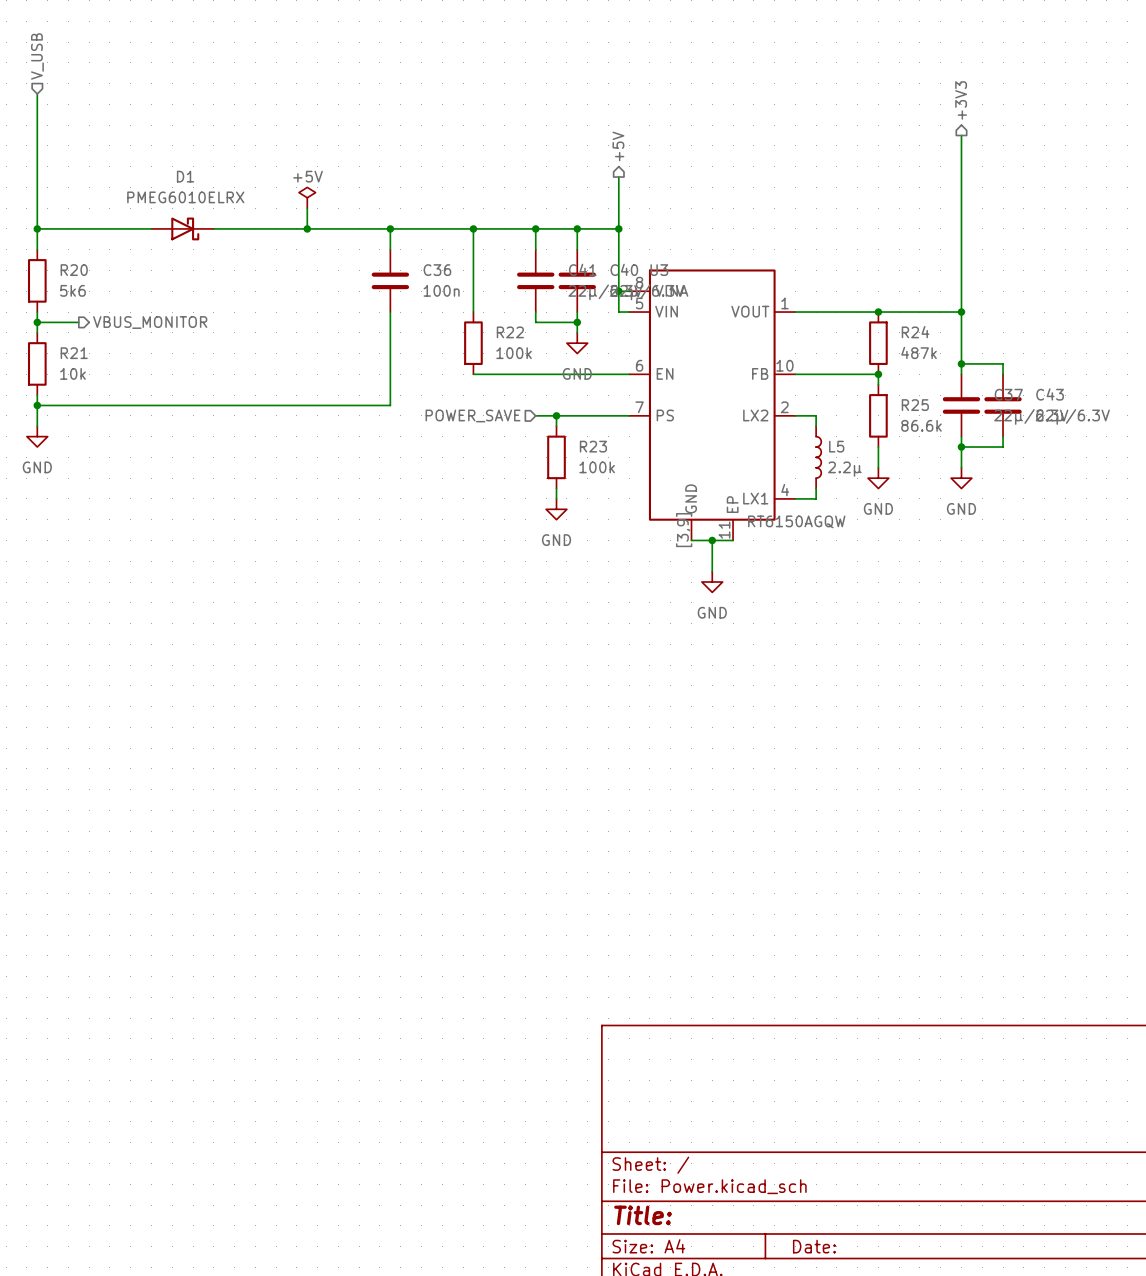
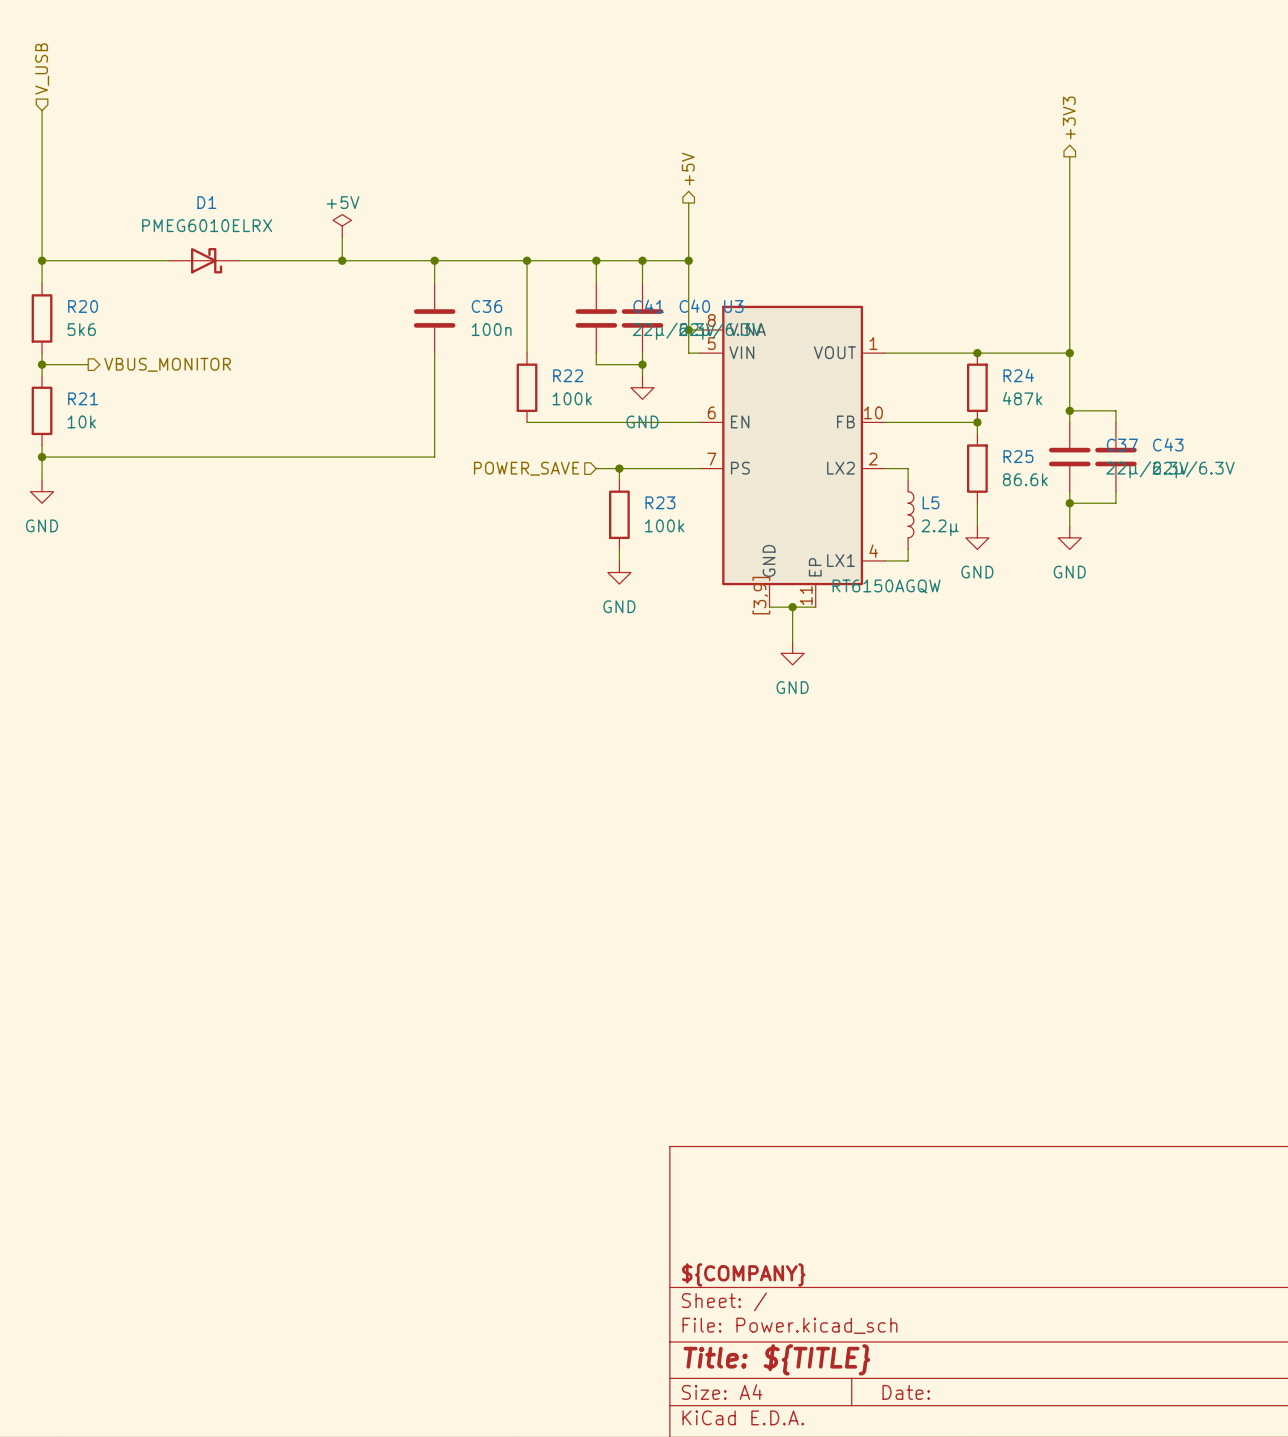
title block: none -> ${COMPANY} (743, 1274)
title block: Title: (643, 1215) -> Title: ${TITLE} (776, 1359)

